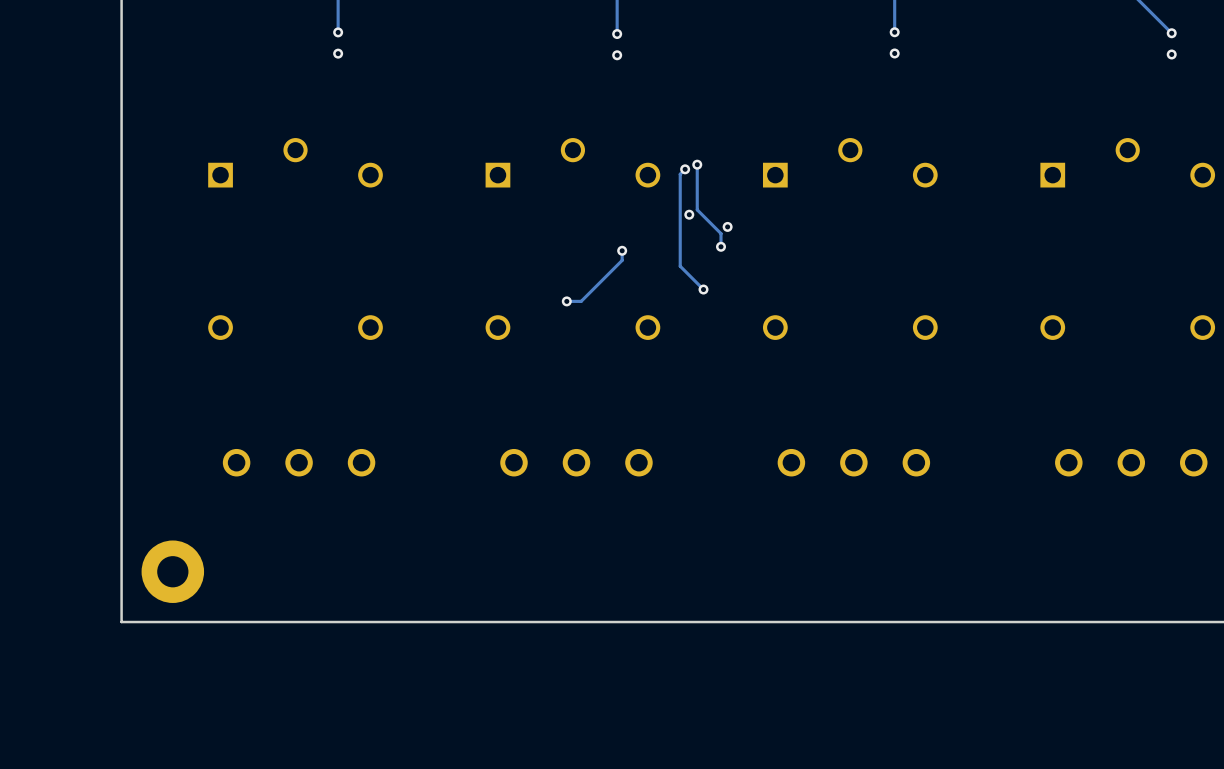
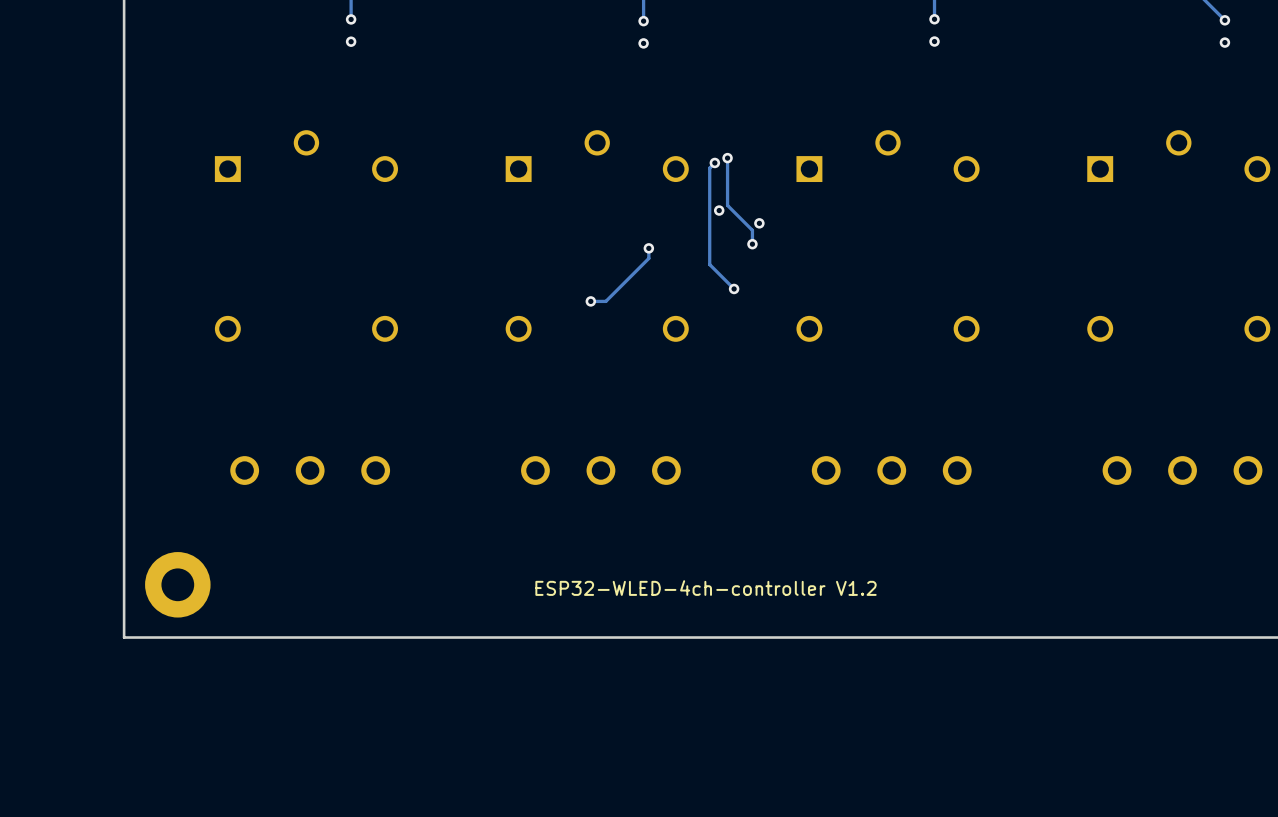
text: none -> ESP32-WLED-4ch-controller V1.2 (706, 588)

